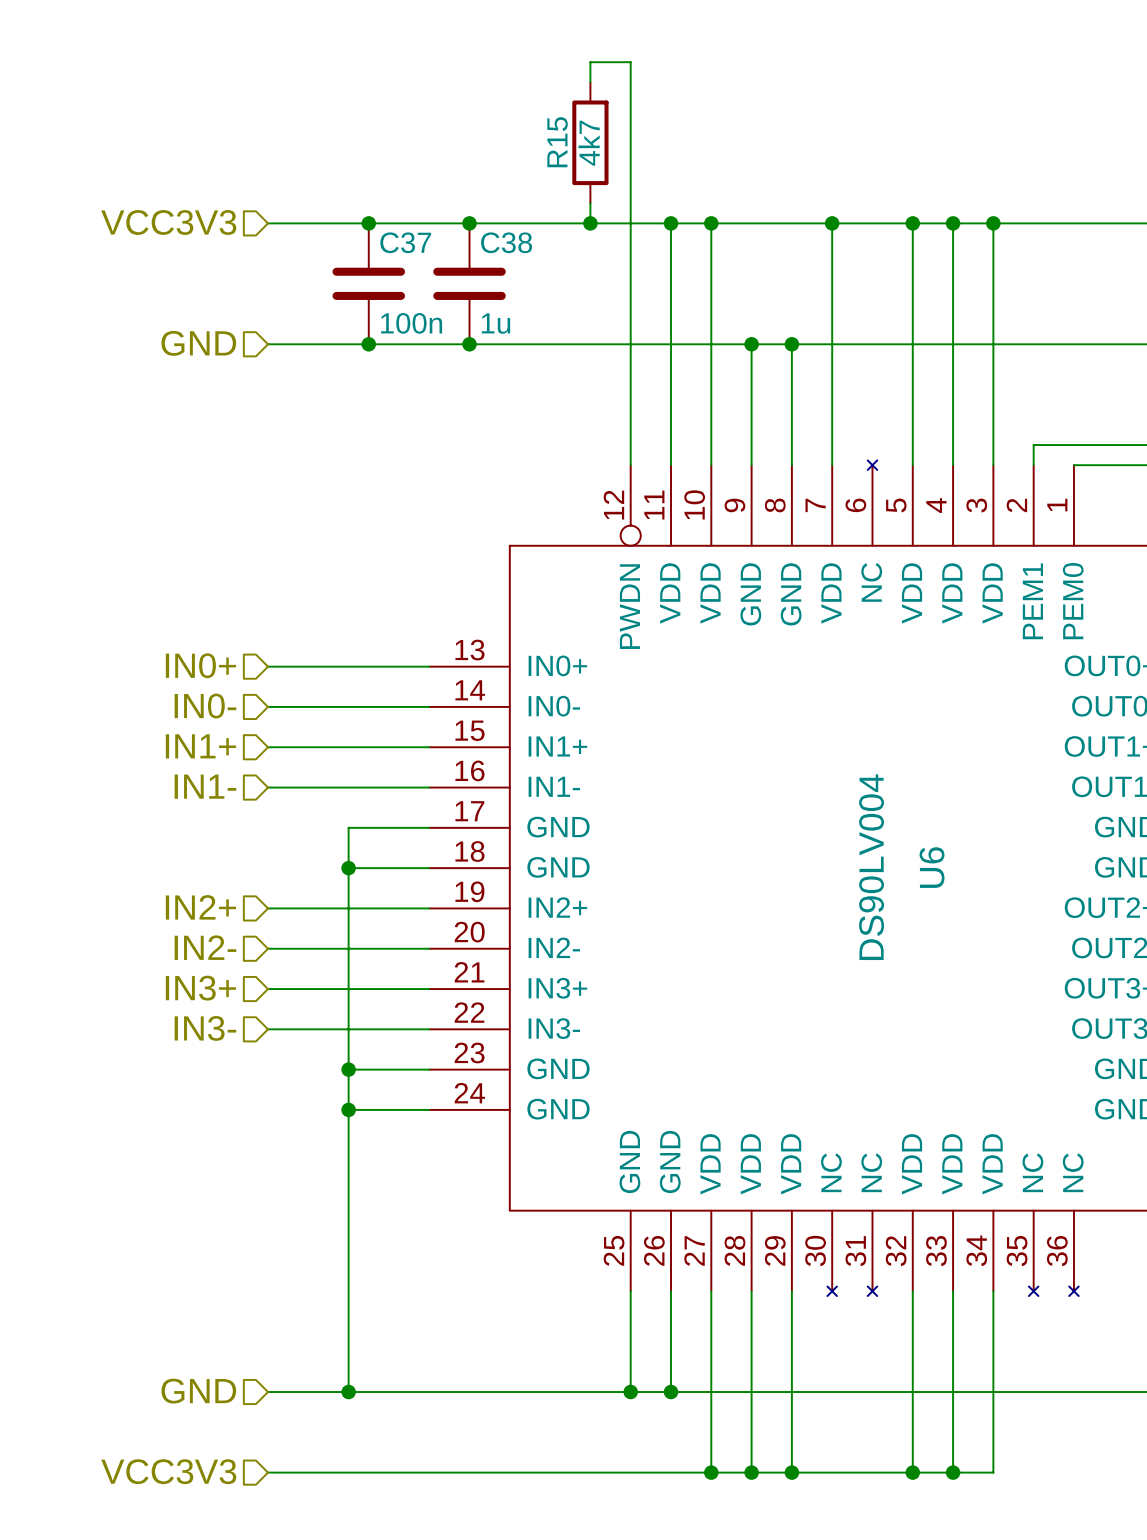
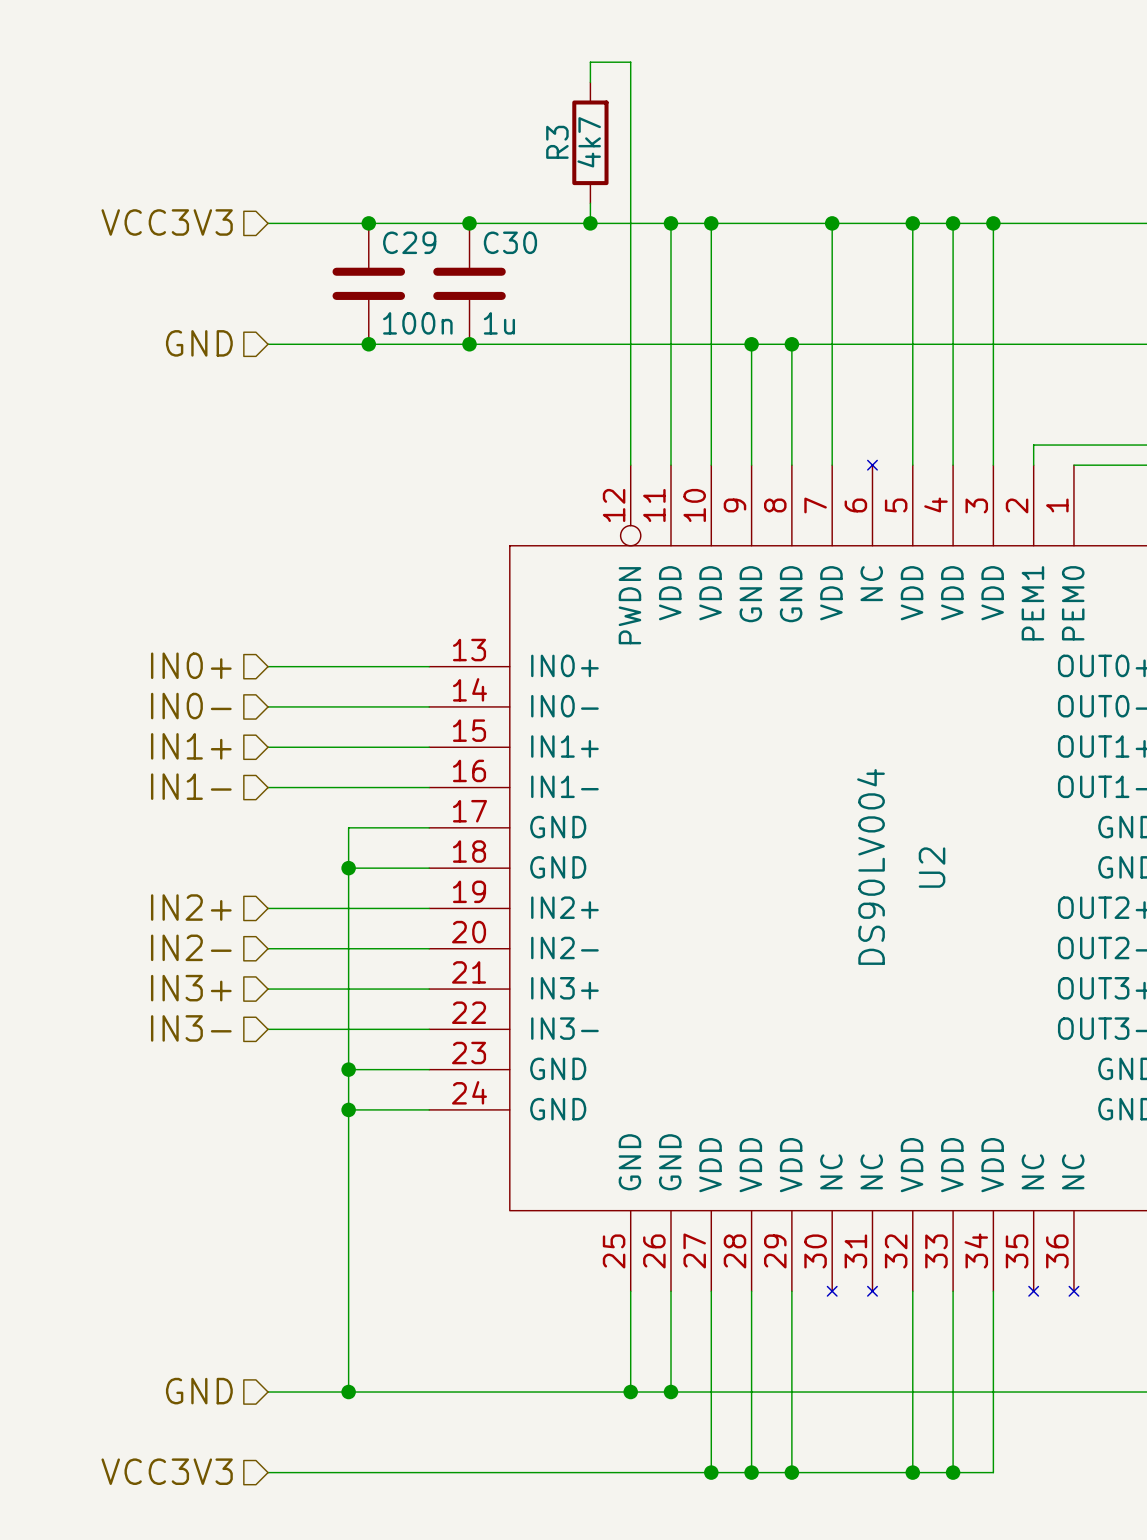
R15 name: R15 (557, 142) -> R3 (557, 142)
C37 name: C37 (405, 242) -> C29 (409, 242)
C38 name: C38 (506, 242) -> C30 (510, 242)
U6 name: U6 (932, 867) -> U2 (932, 867)

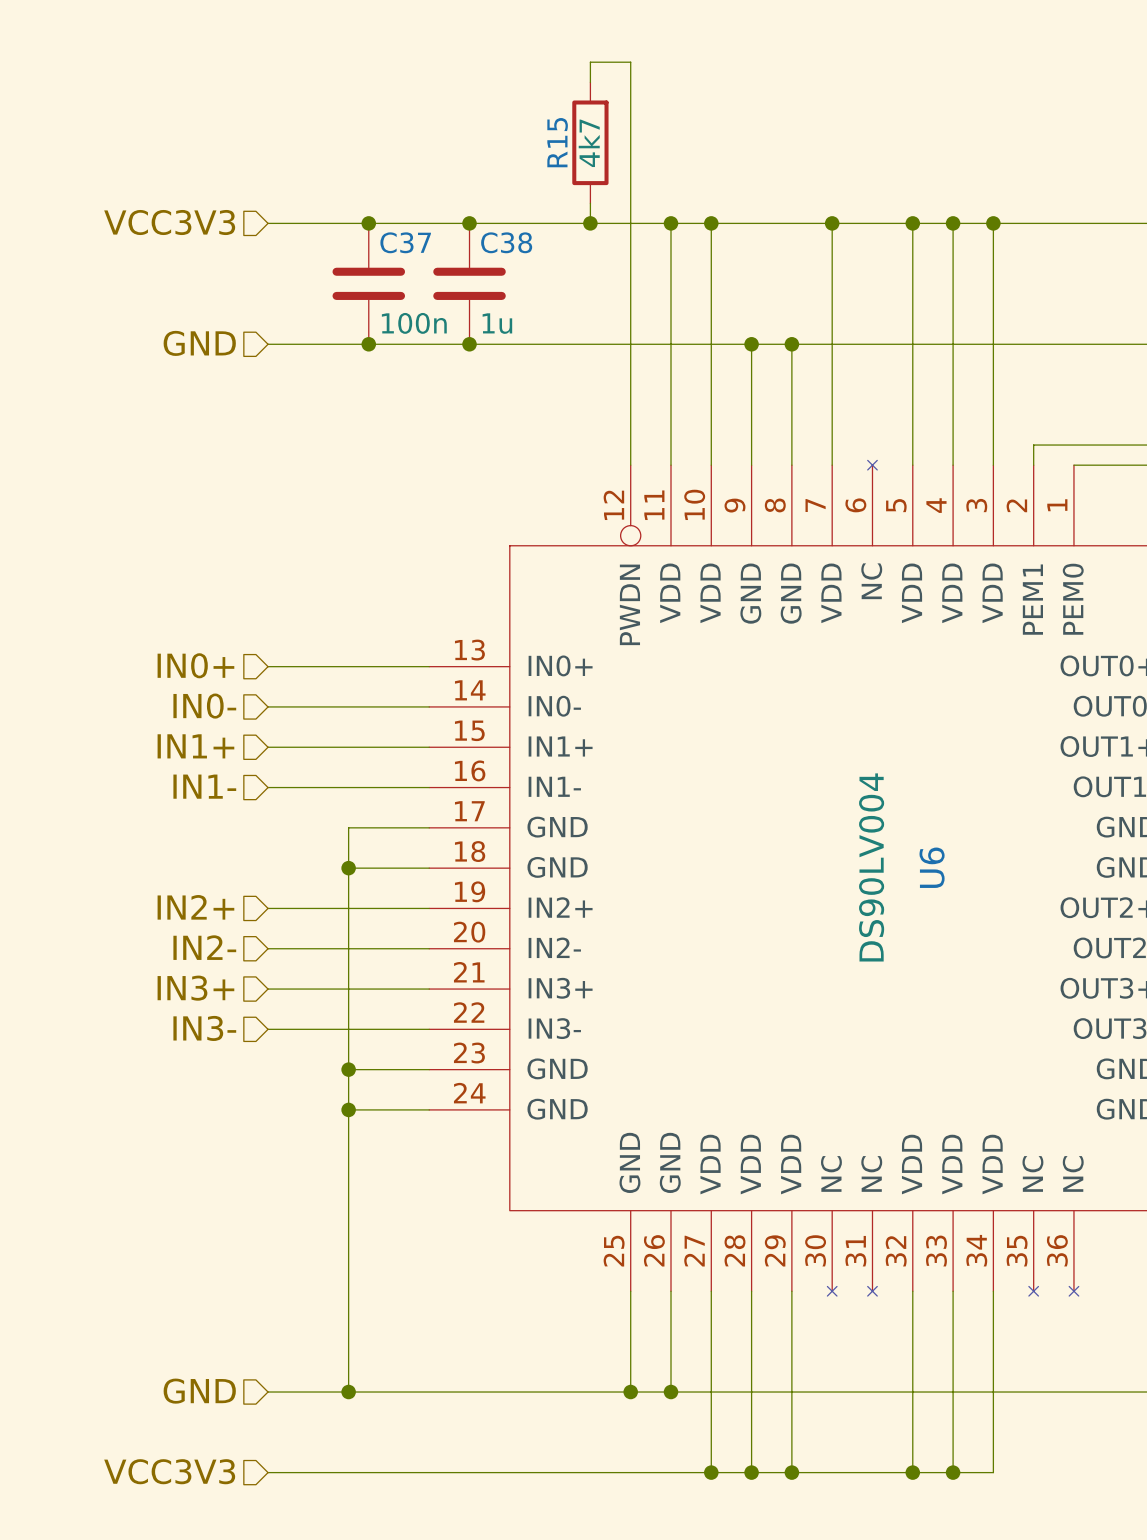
R3 name: R3 (557, 142) -> R15 (557, 142)
C29 name: C29 (409, 242) -> C37 (405, 242)
C30 name: C30 (510, 242) -> C38 (506, 242)
U2 name: U2 (932, 867) -> U6 (932, 867)

